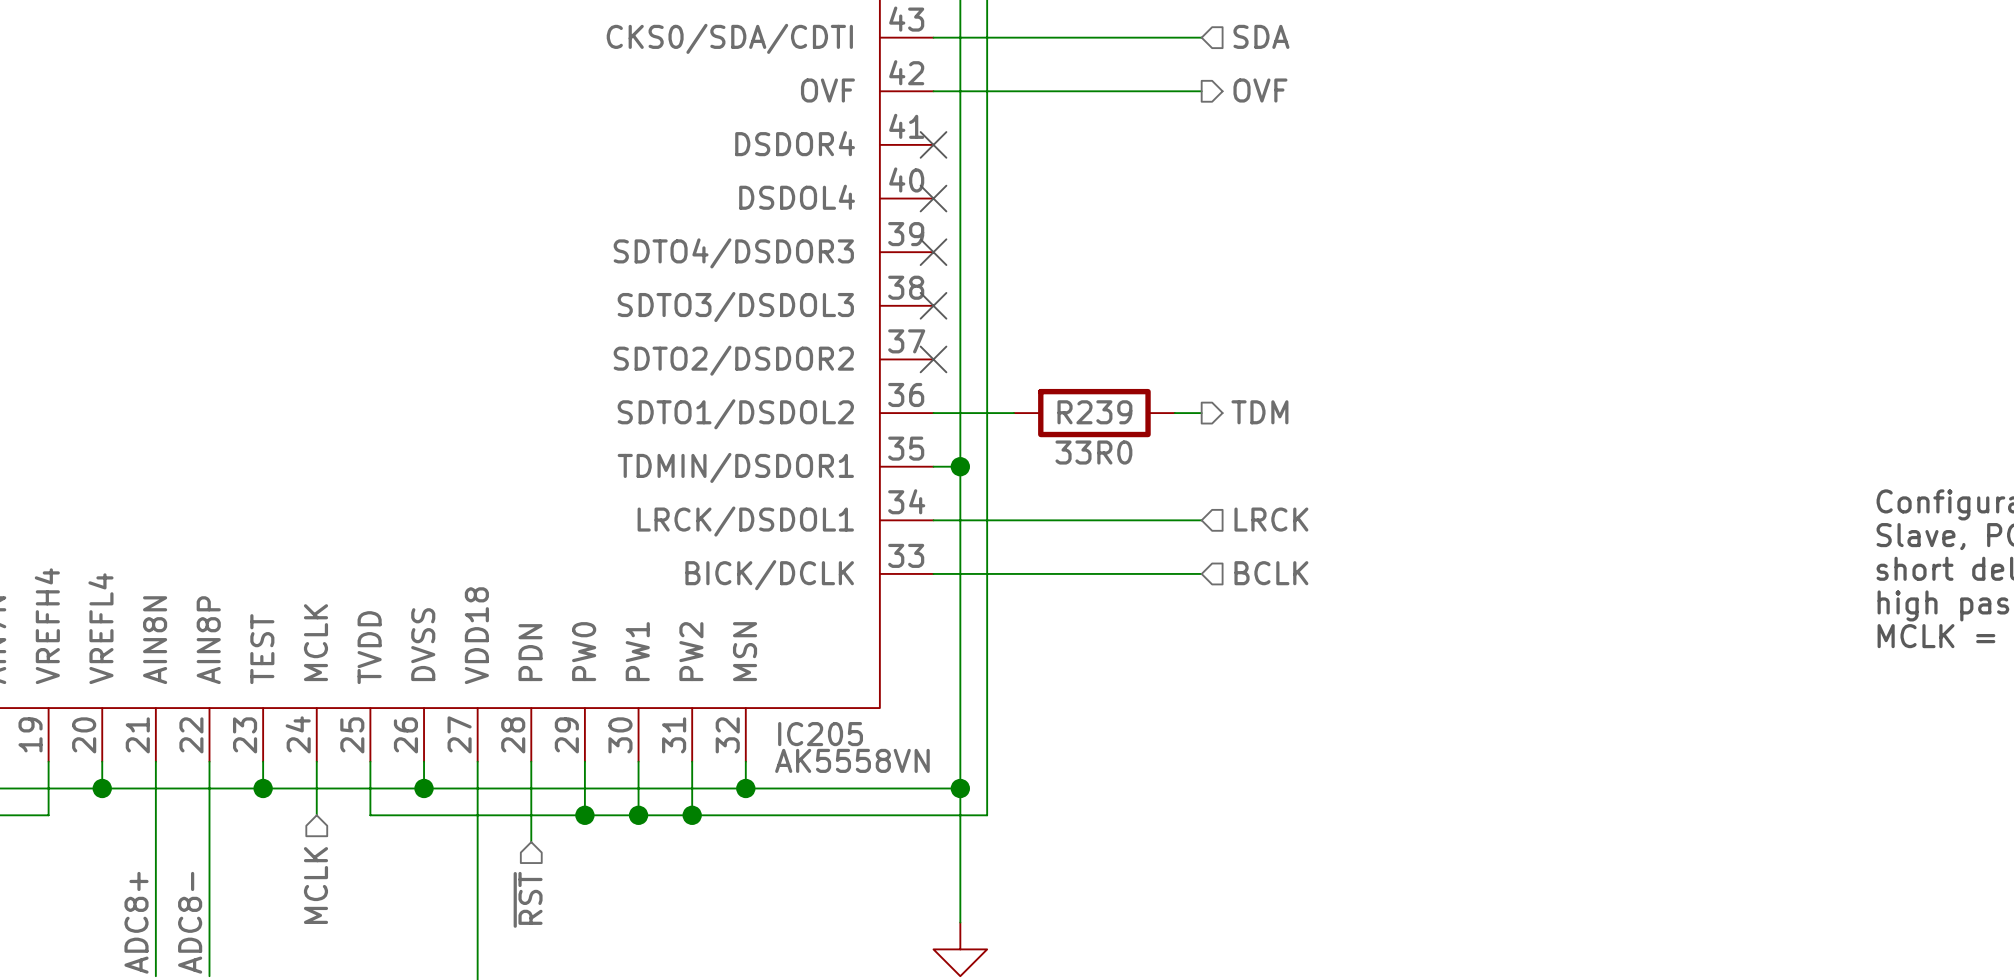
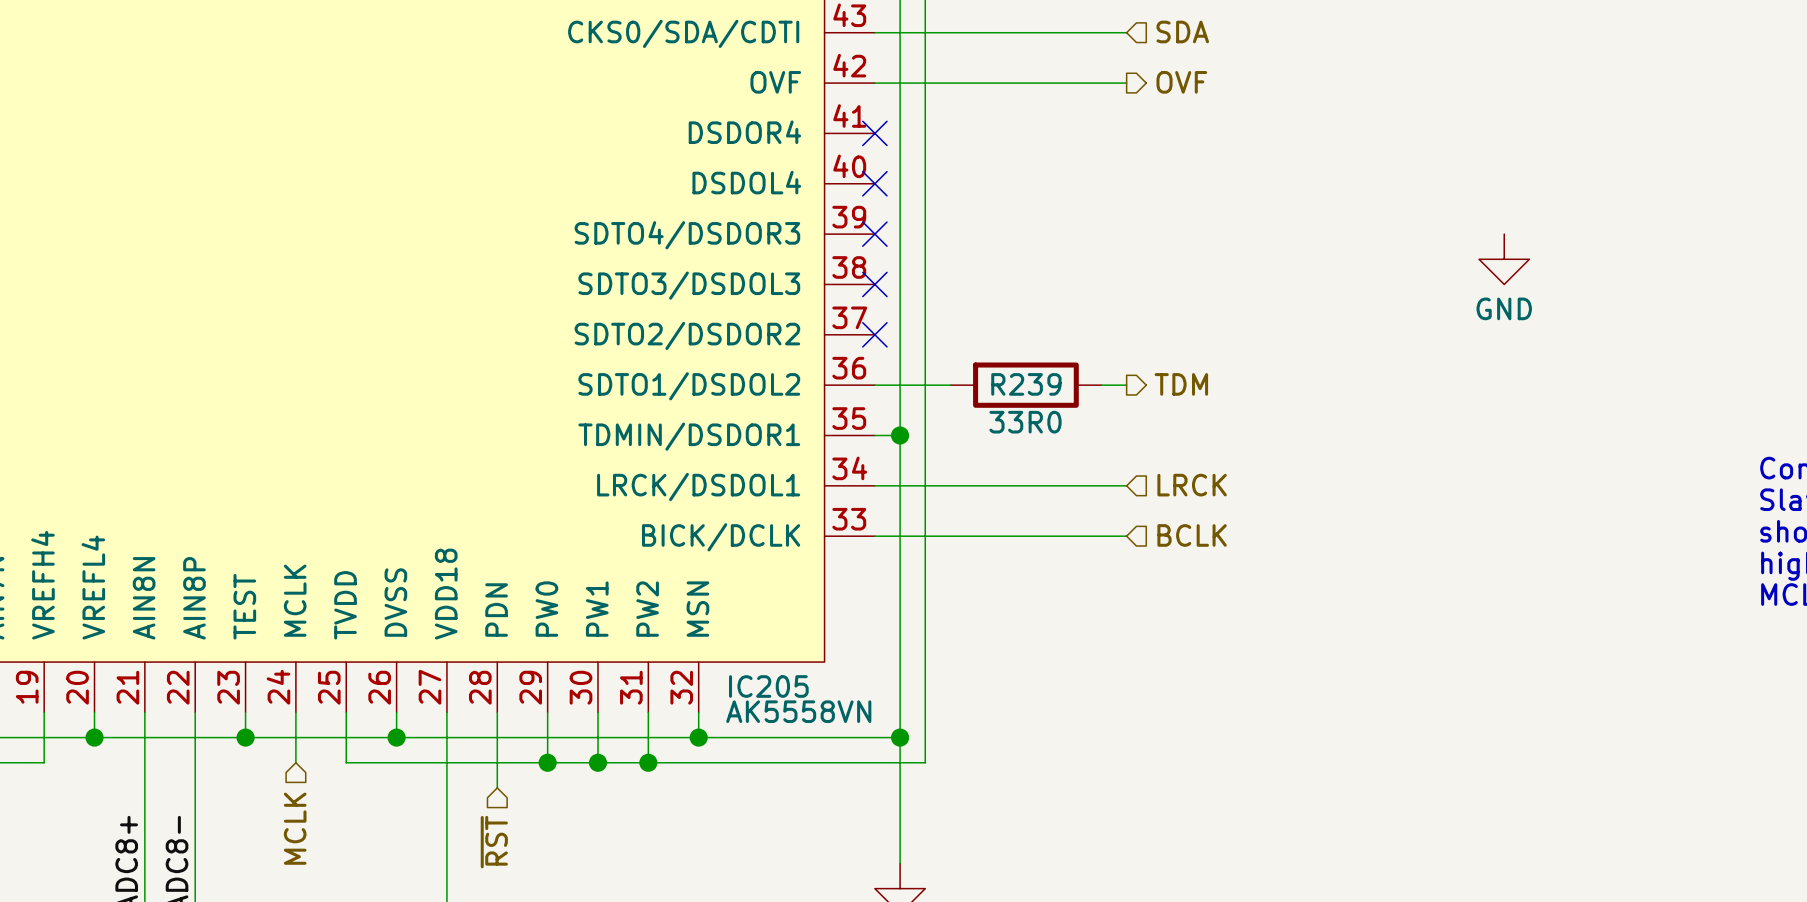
power symbol: none -> GND (1504, 259)

